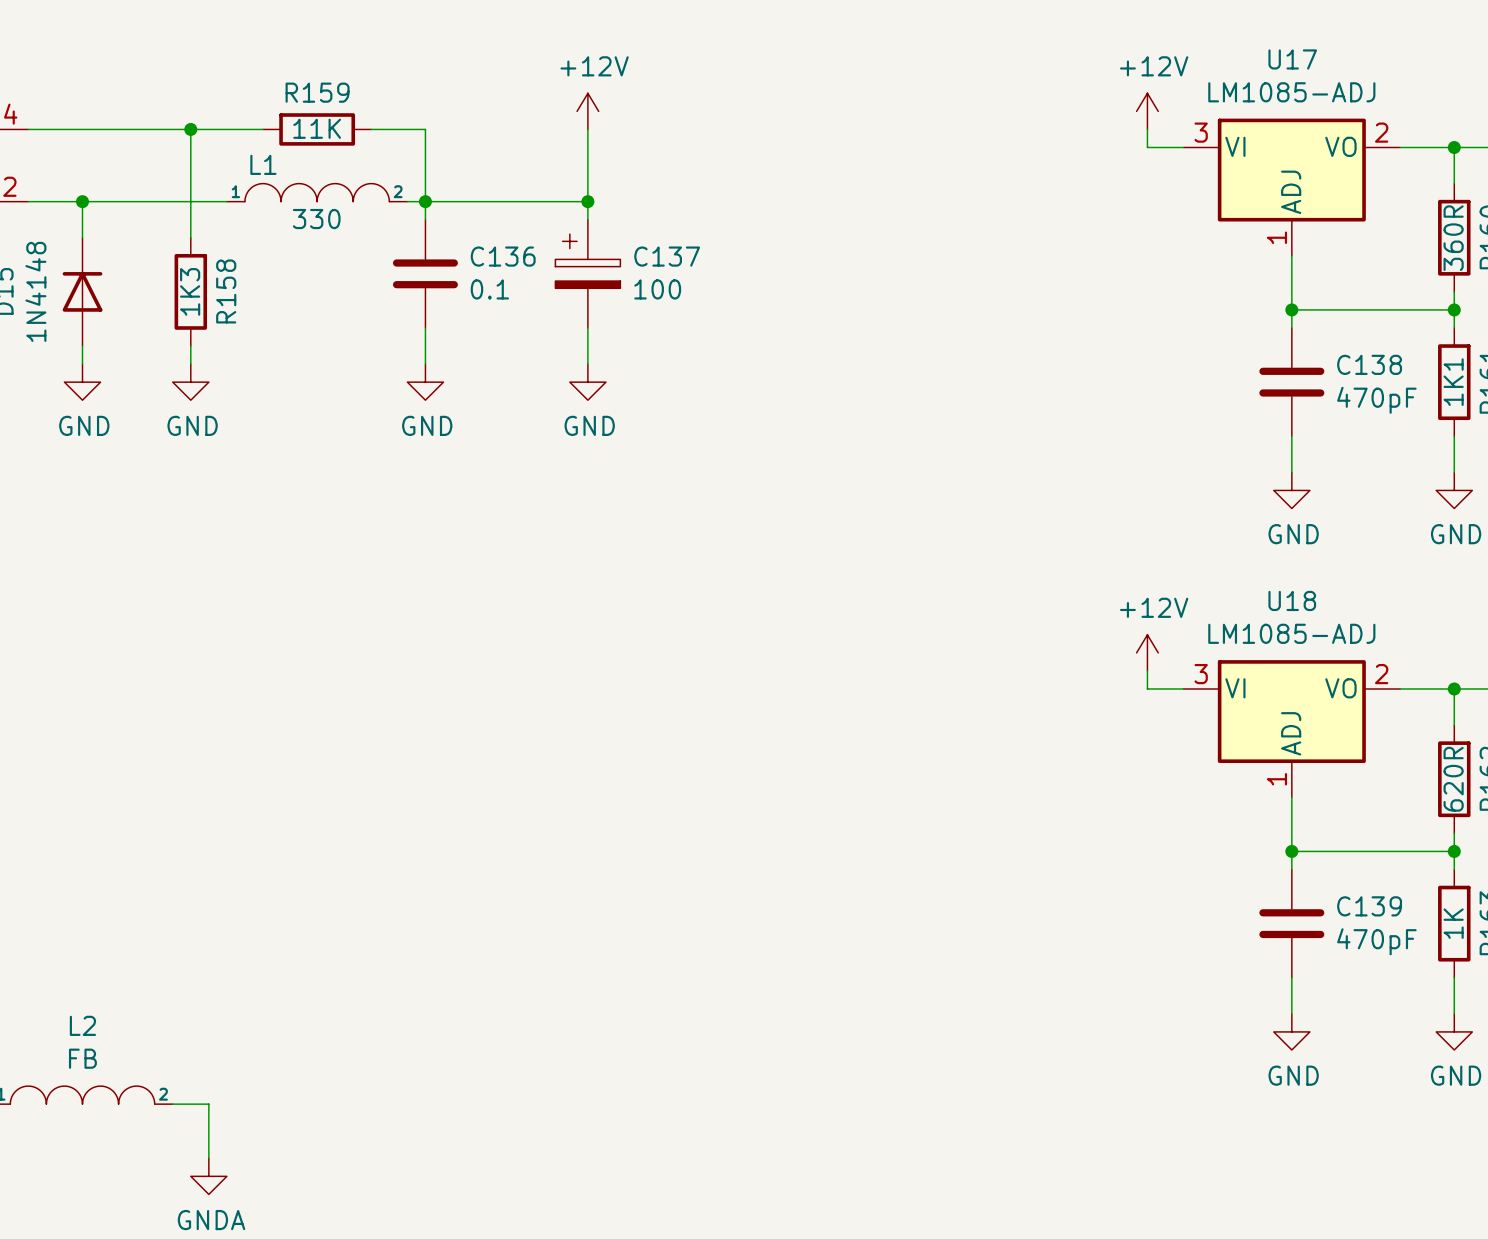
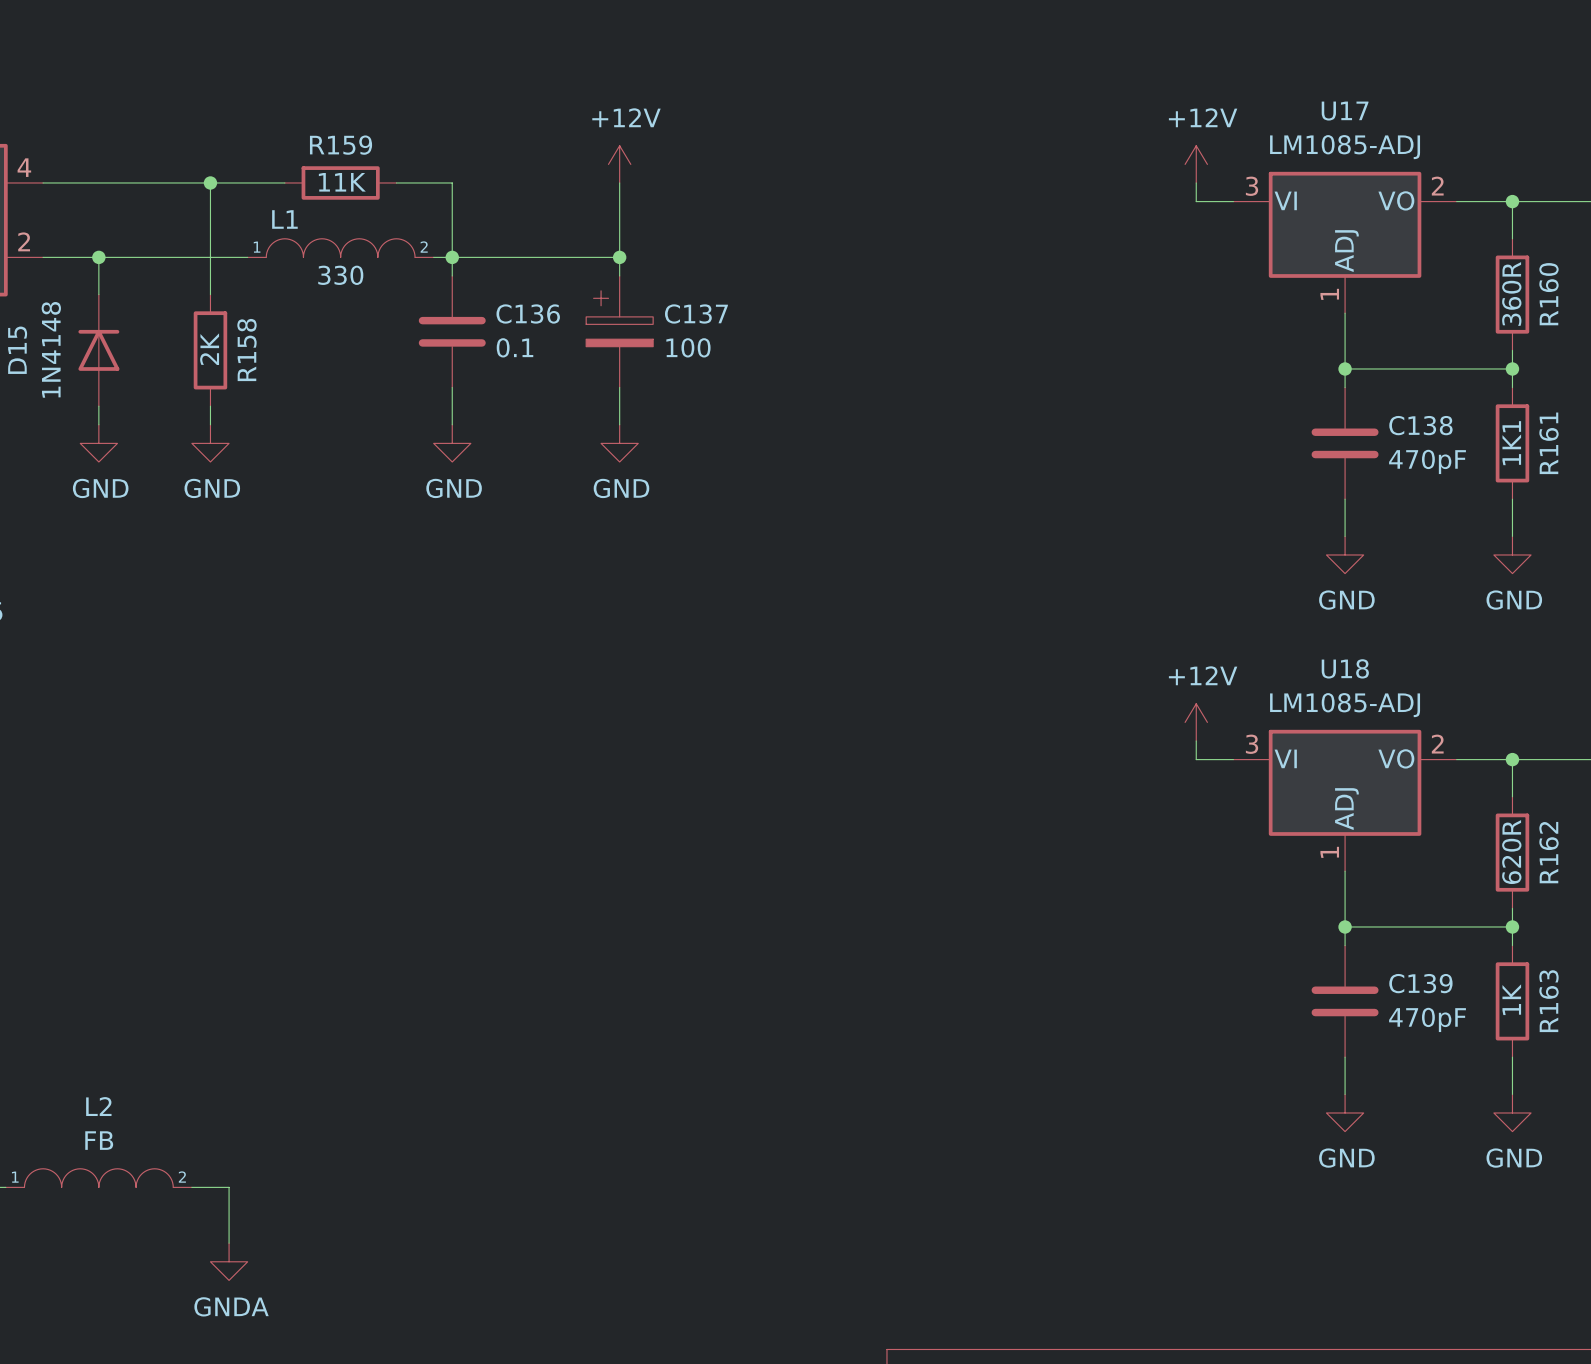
R158 value: 1K3 (190, 291) -> 2K (209, 349)

